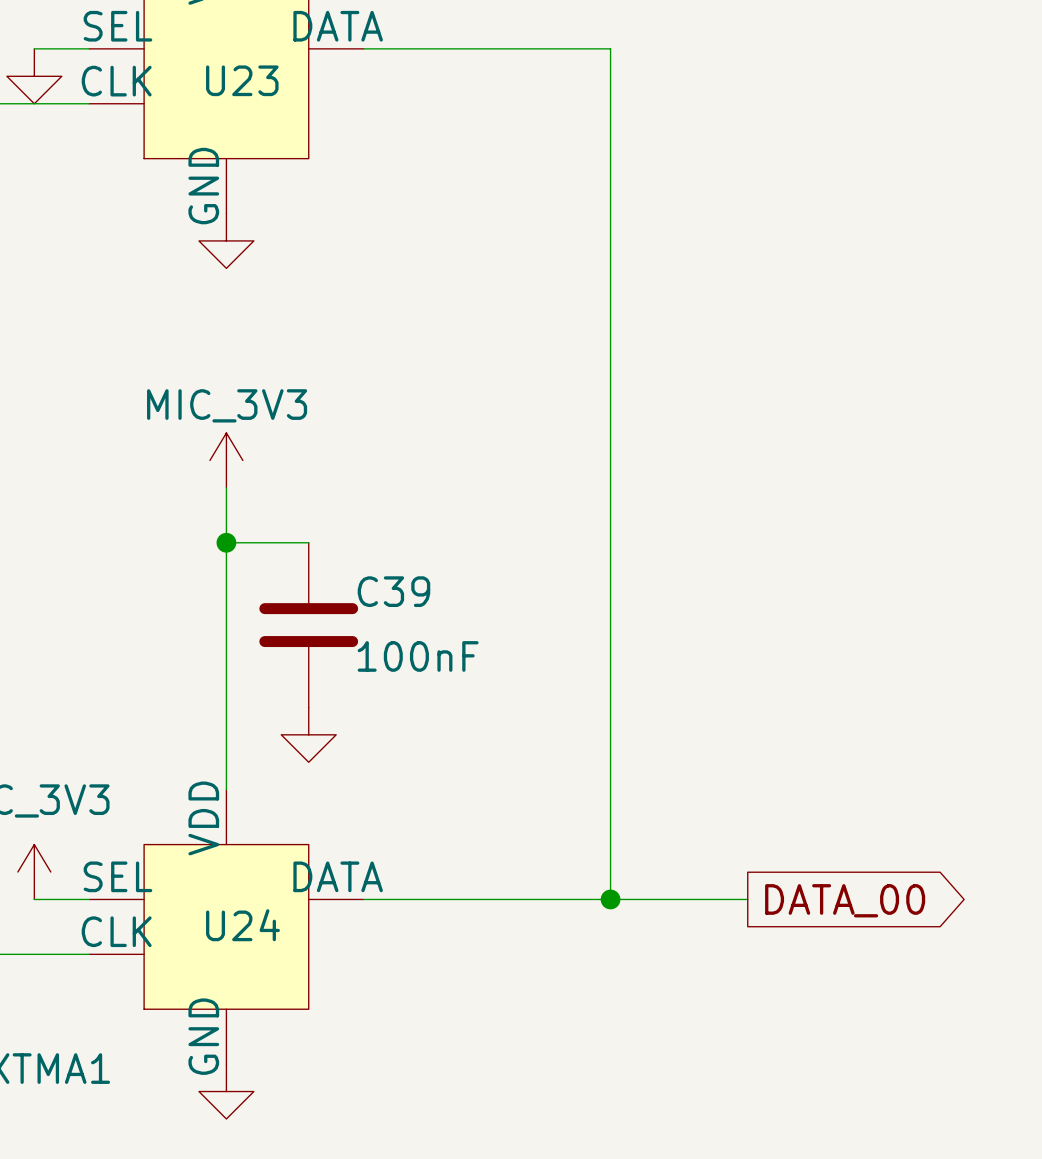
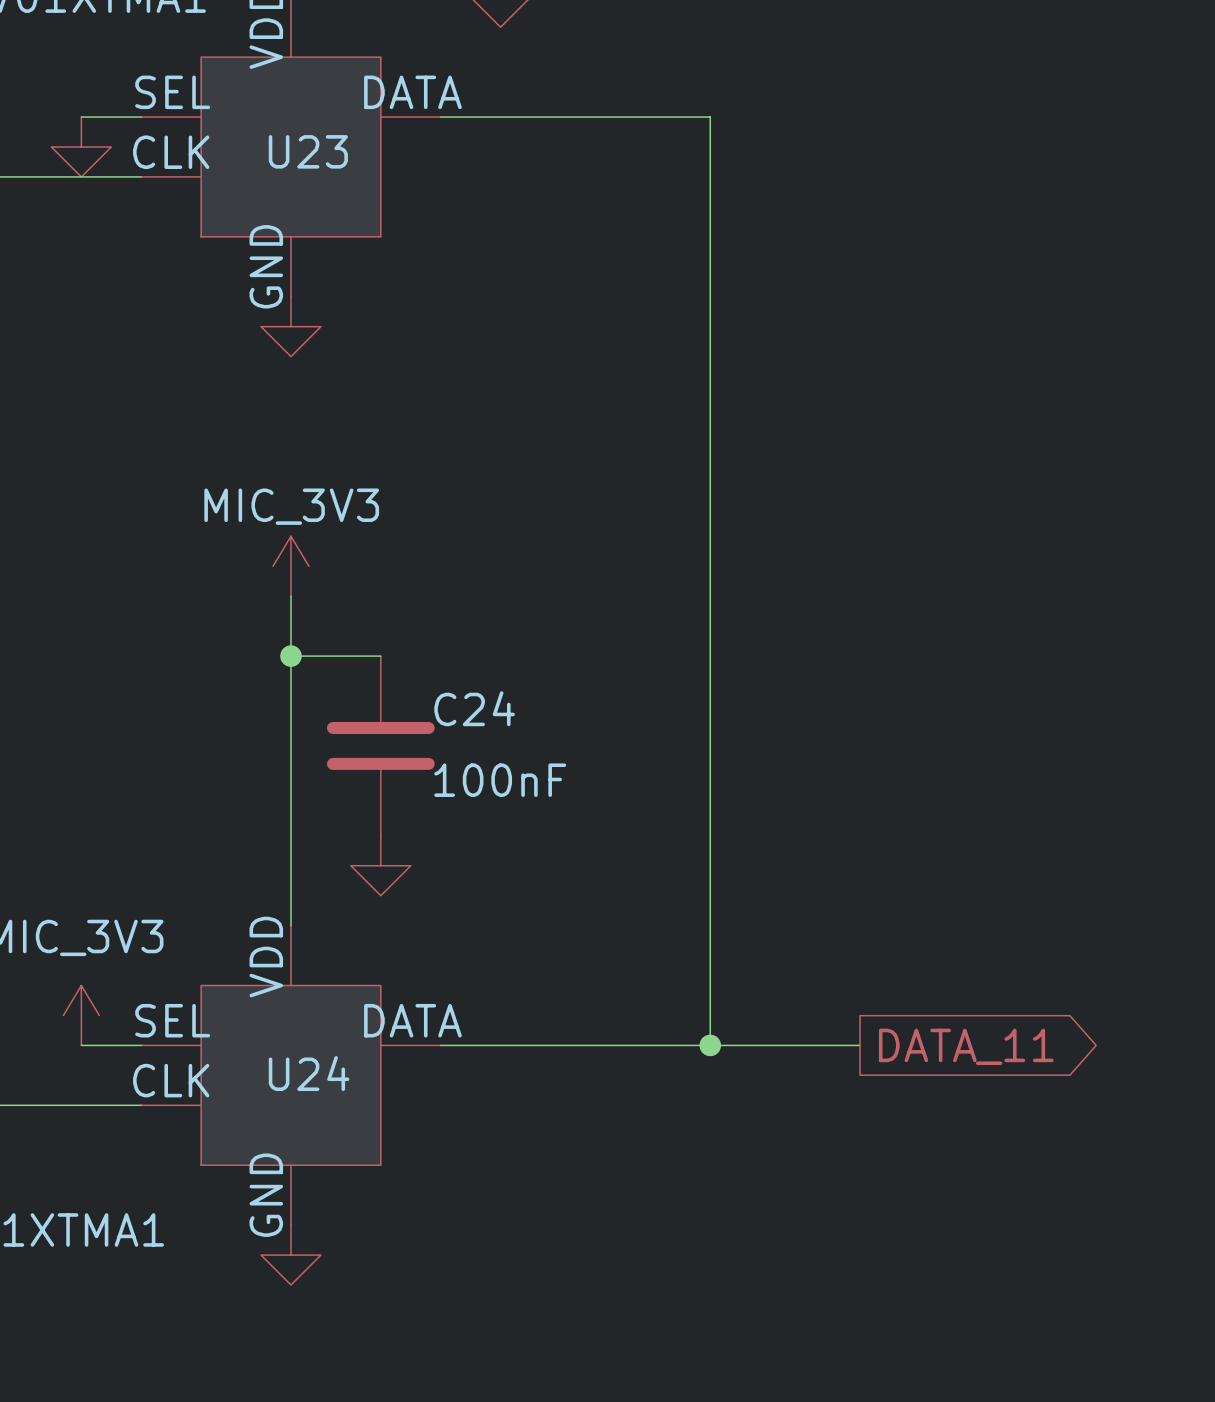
C39 name: C39 (393, 591) -> C24 (474, 708)
global label: DATA_00 (845, 900) -> DATA_11 (966, 1046)

